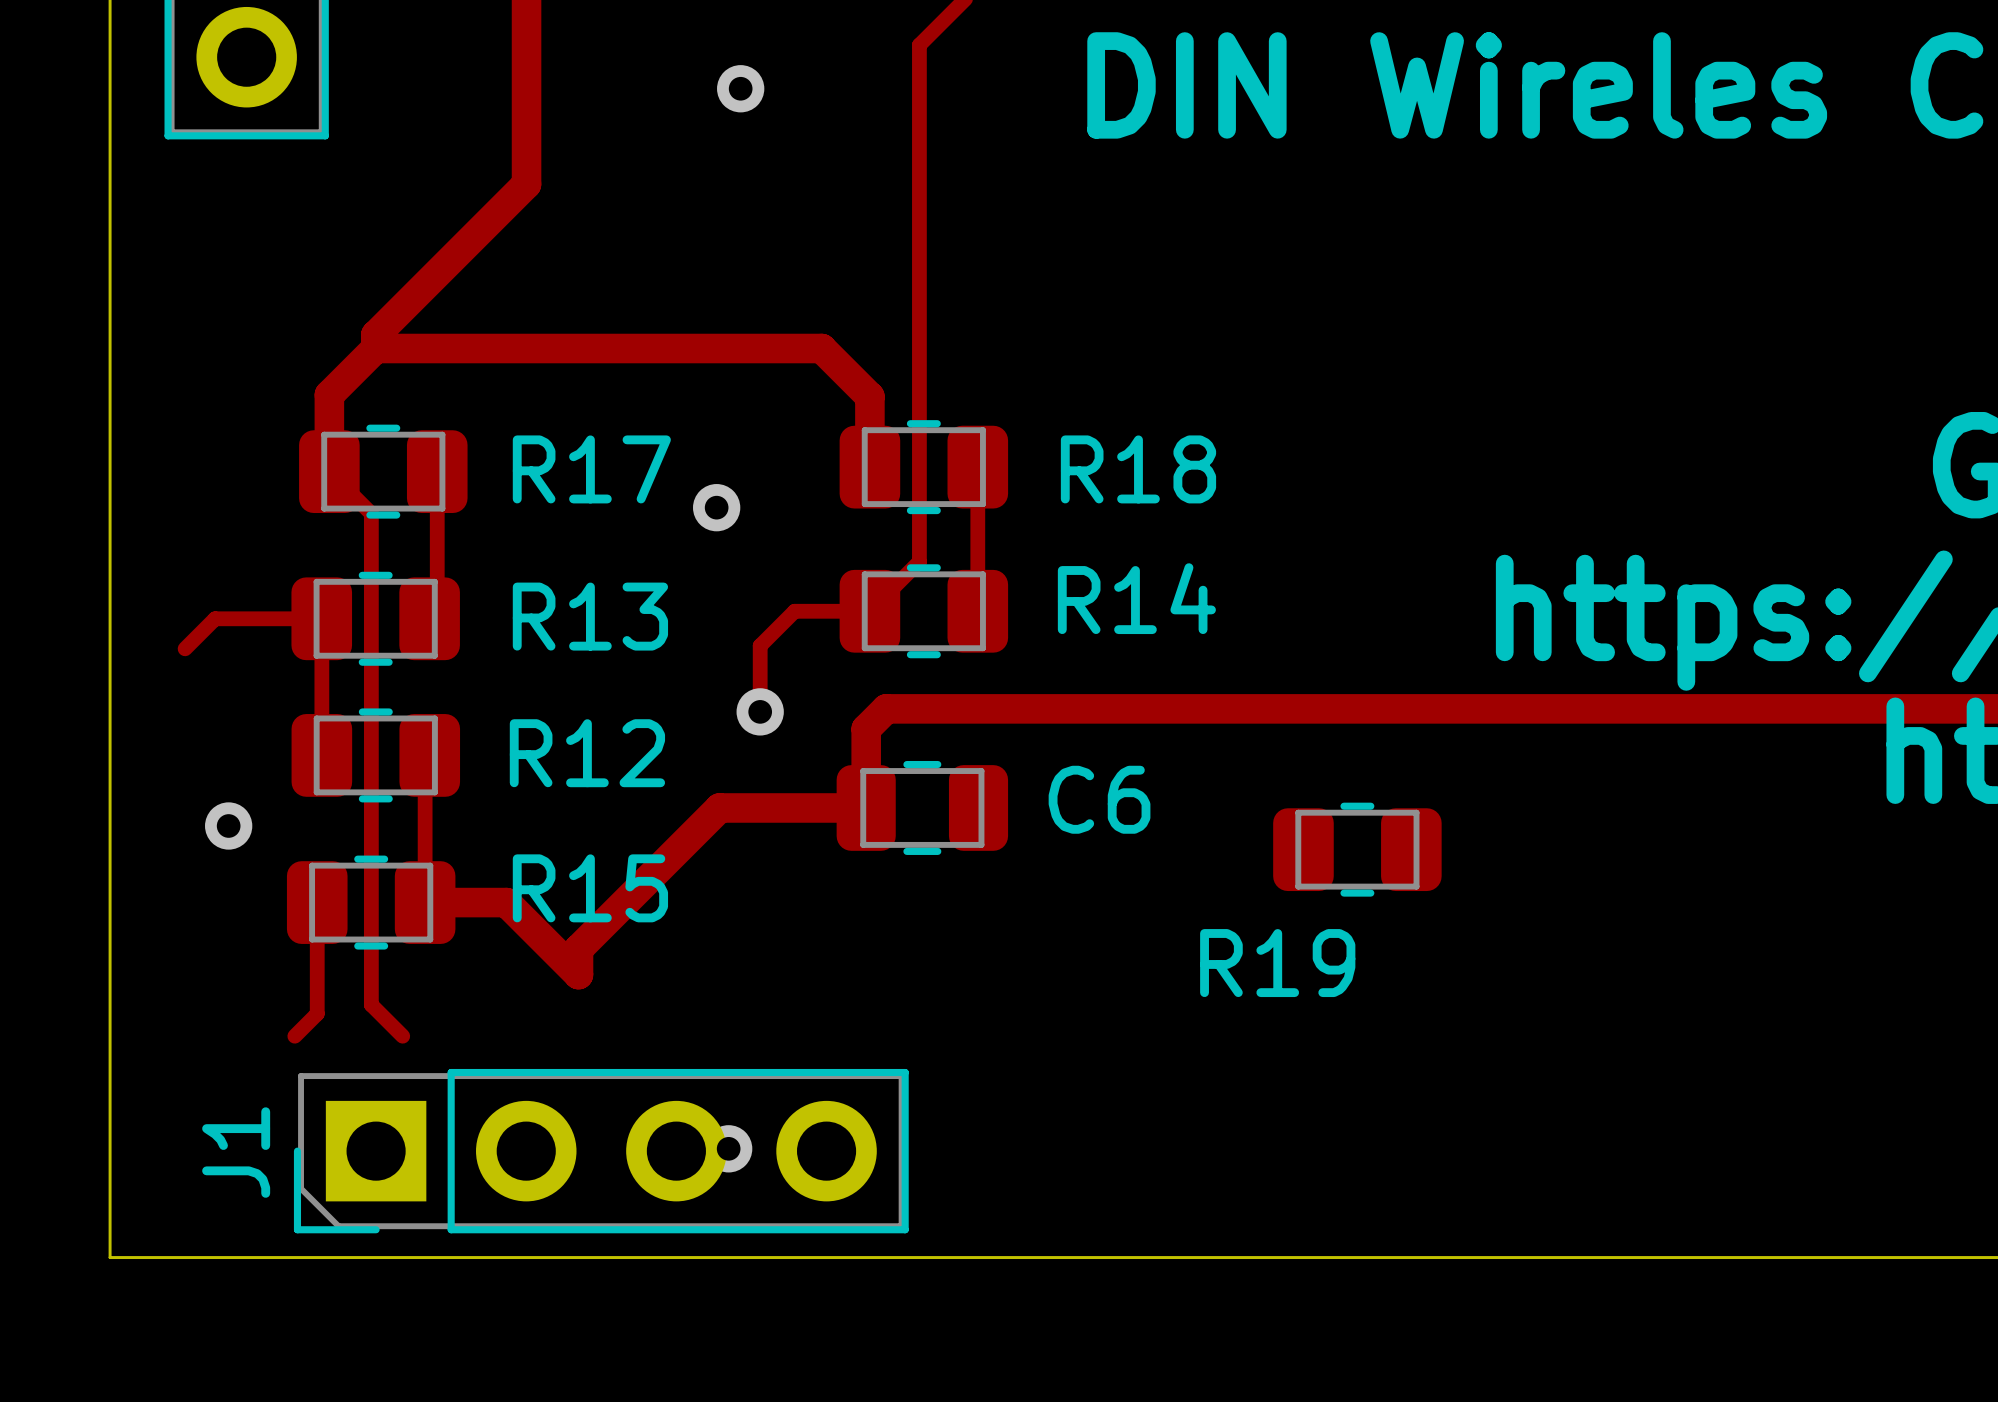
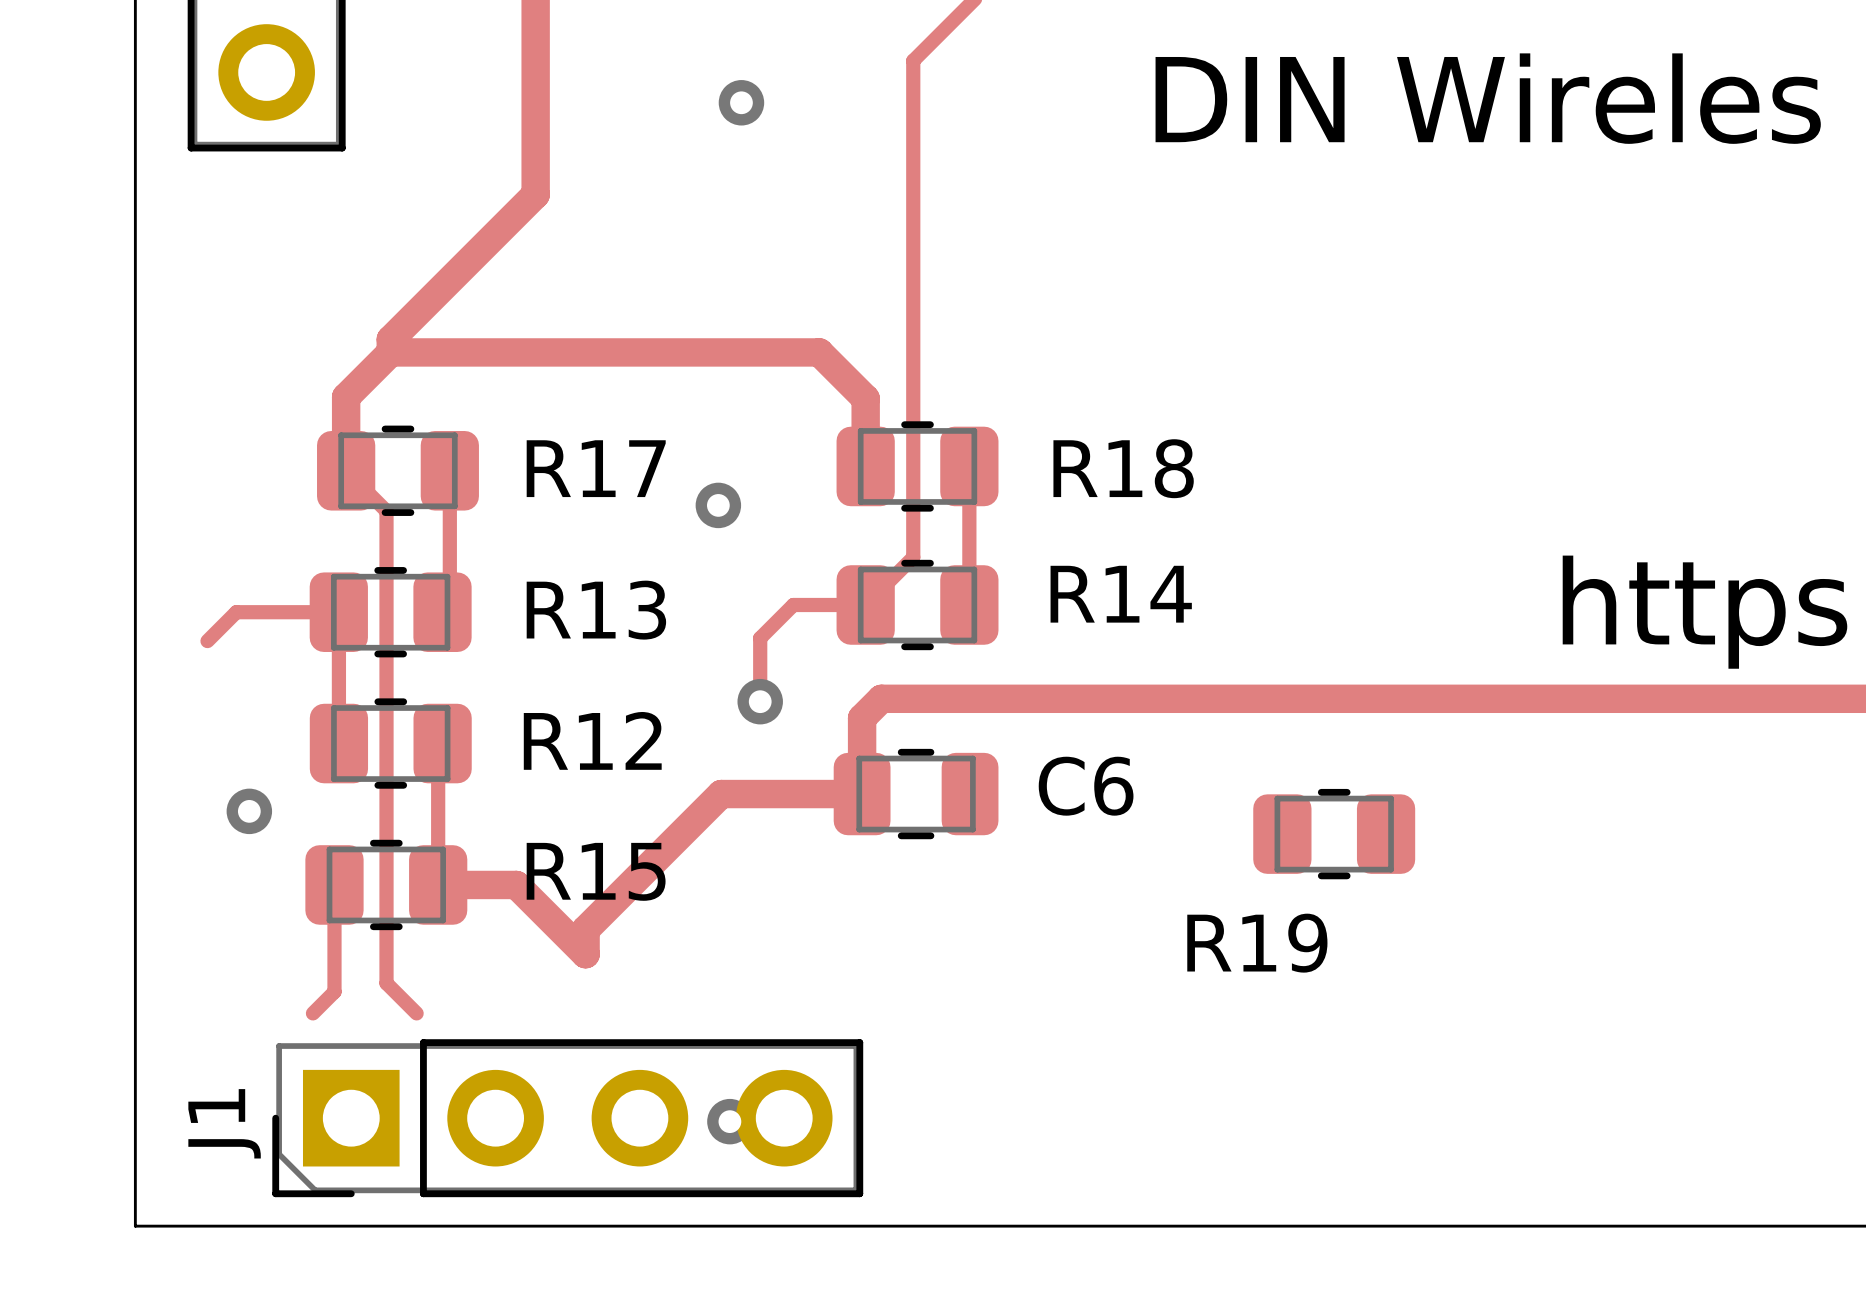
J1 position: (601, 1151) -> (567, 1118)

